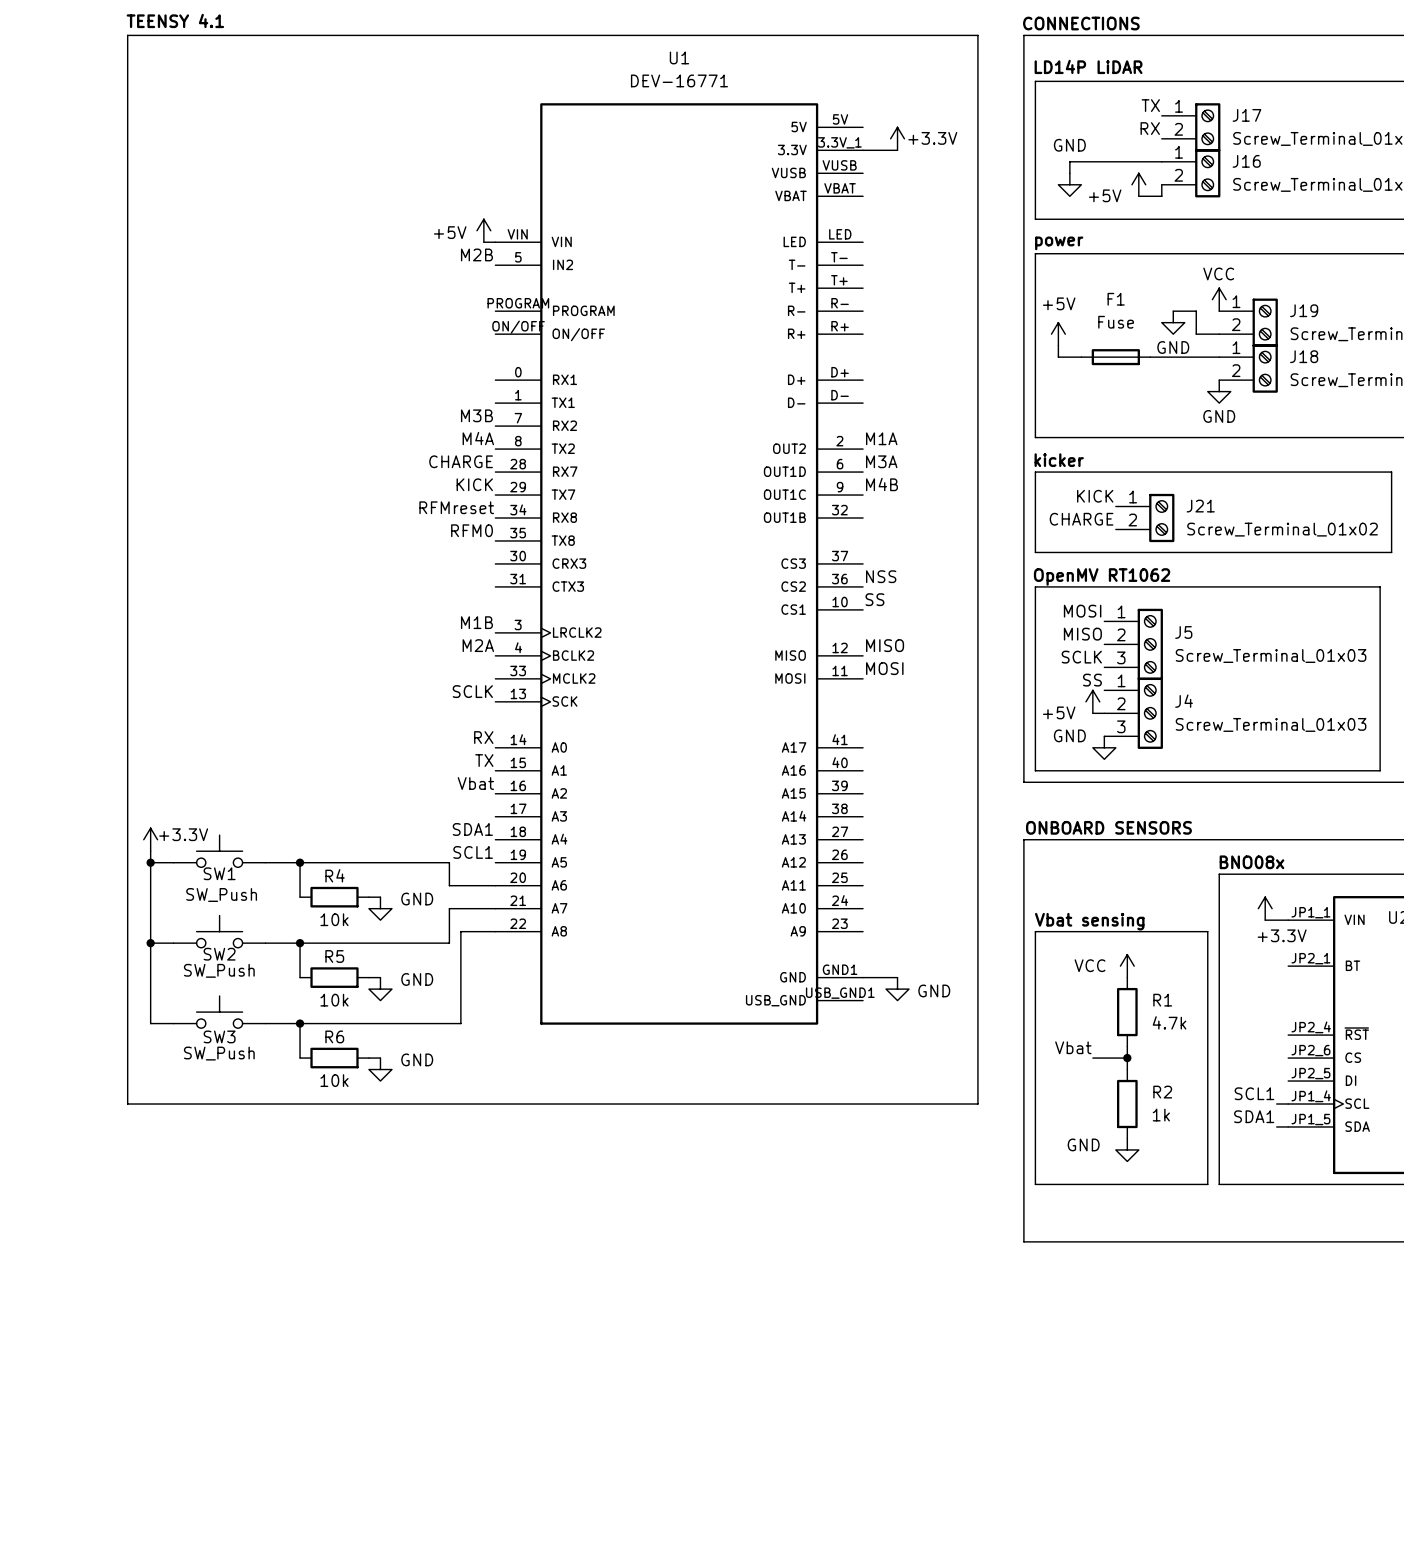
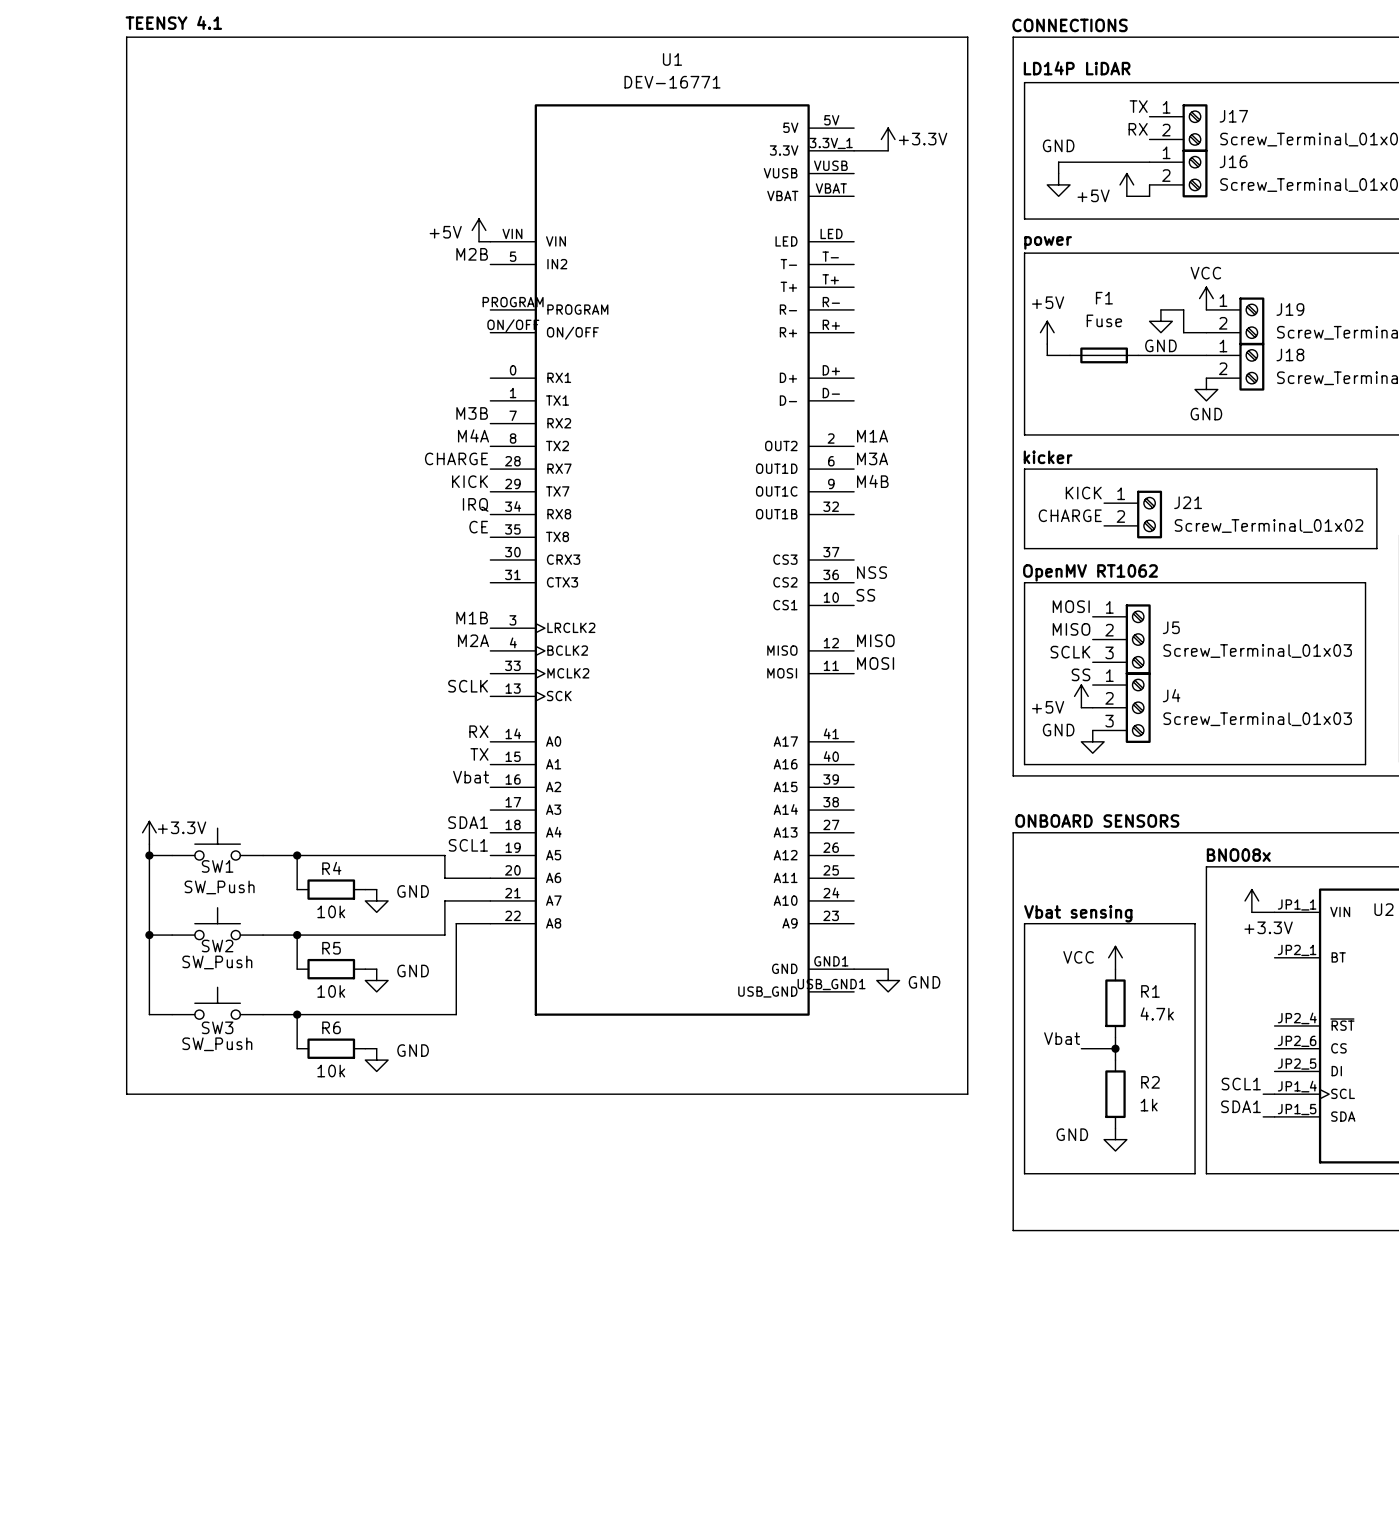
label: RFMreset (456, 507) -> IRQ (475, 504)
label: RFM0 (472, 530) -> CE (478, 527)

